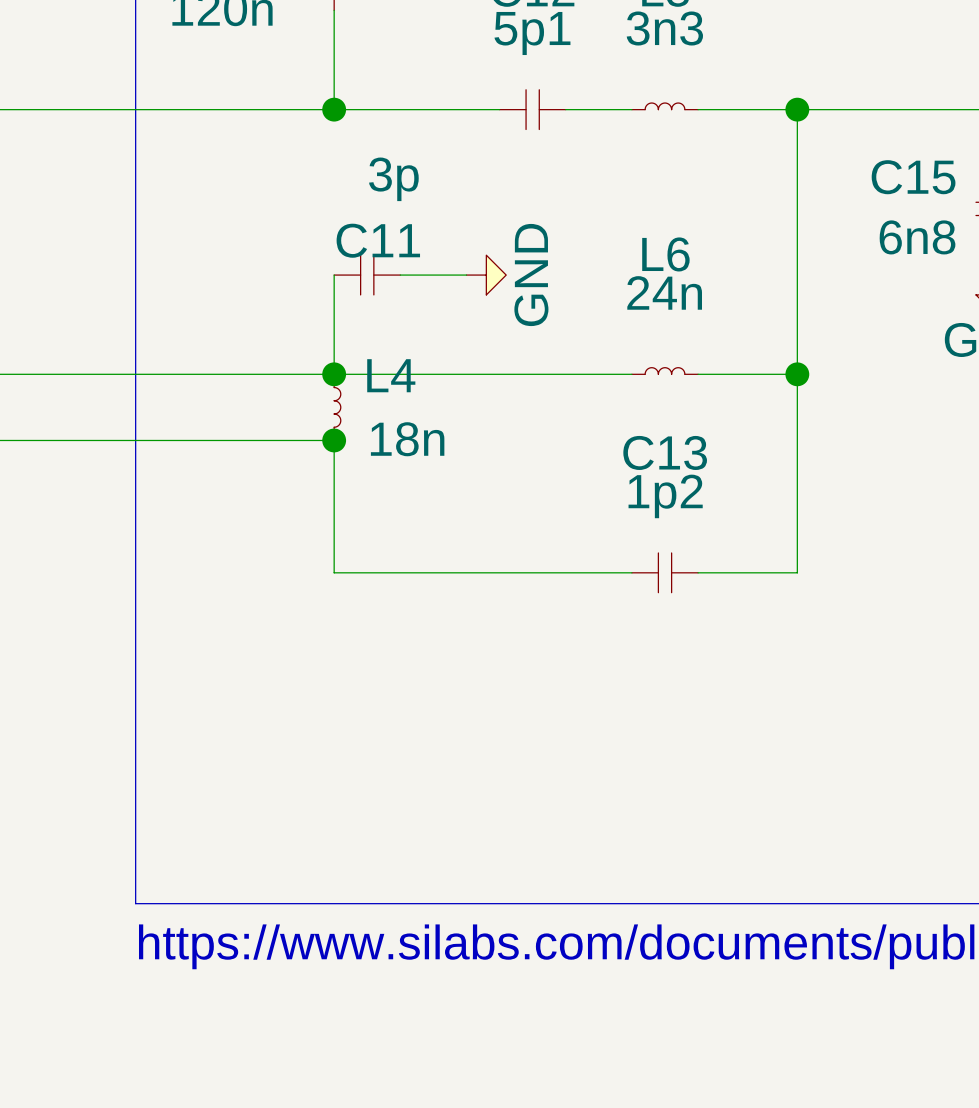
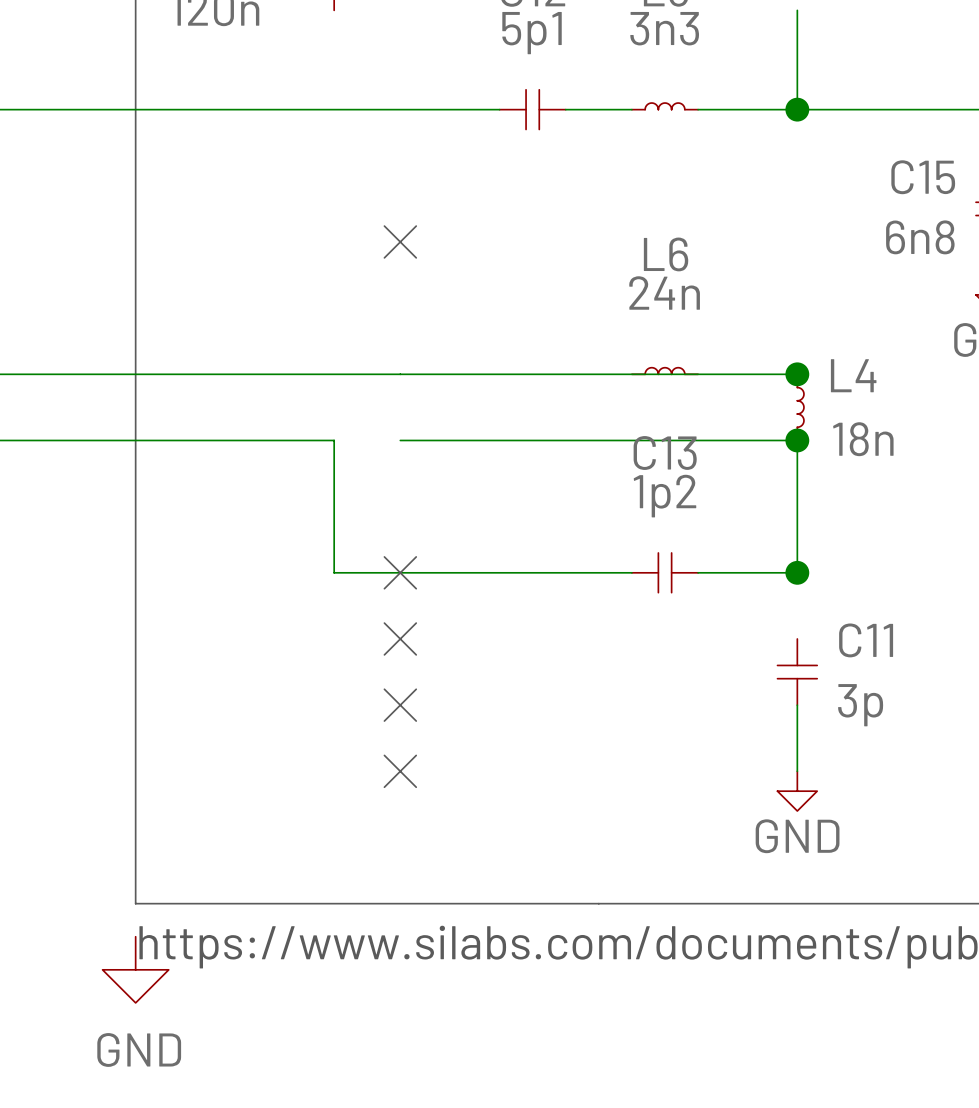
wire: (334, 10) (334, 109) -> none
junction: (334, 109) -> none
wire: (797, 109) (797, 440) -> (797, 109) (797, 10)
C11 name position: C11 (378, 240) -> C11 (866, 640)
no-connect mark: none -> (400, 241)
wire: (334, 275) (334, 374) -> none
C11 rotation: 0° (367, 275) -> 90° clockwise (797, 672)
C11 position: (367, 275) -> (797, 672)
wire: (400, 275) (466, 275) -> (631, 374) (698, 374)
power symbol: GND (486, 275) -> none
junction: (334, 374) -> none
L4 position: (337, 407) -> (800, 407)
junction: (334, 440) -> none
wire: none -> (400, 440) (797, 440)
junction: none -> (797, 440)
no-connect mark: none -> (400, 572)
junction: none -> (797, 572)
no-connect mark: none -> (400, 638)
no-connect mark: none -> (400, 705)
wire: none -> (797, 705) (797, 771)
no-connect mark: none -> (400, 771)
power symbol: none -> GND (797, 791)
power symbol: none -> GND (135, 969)

